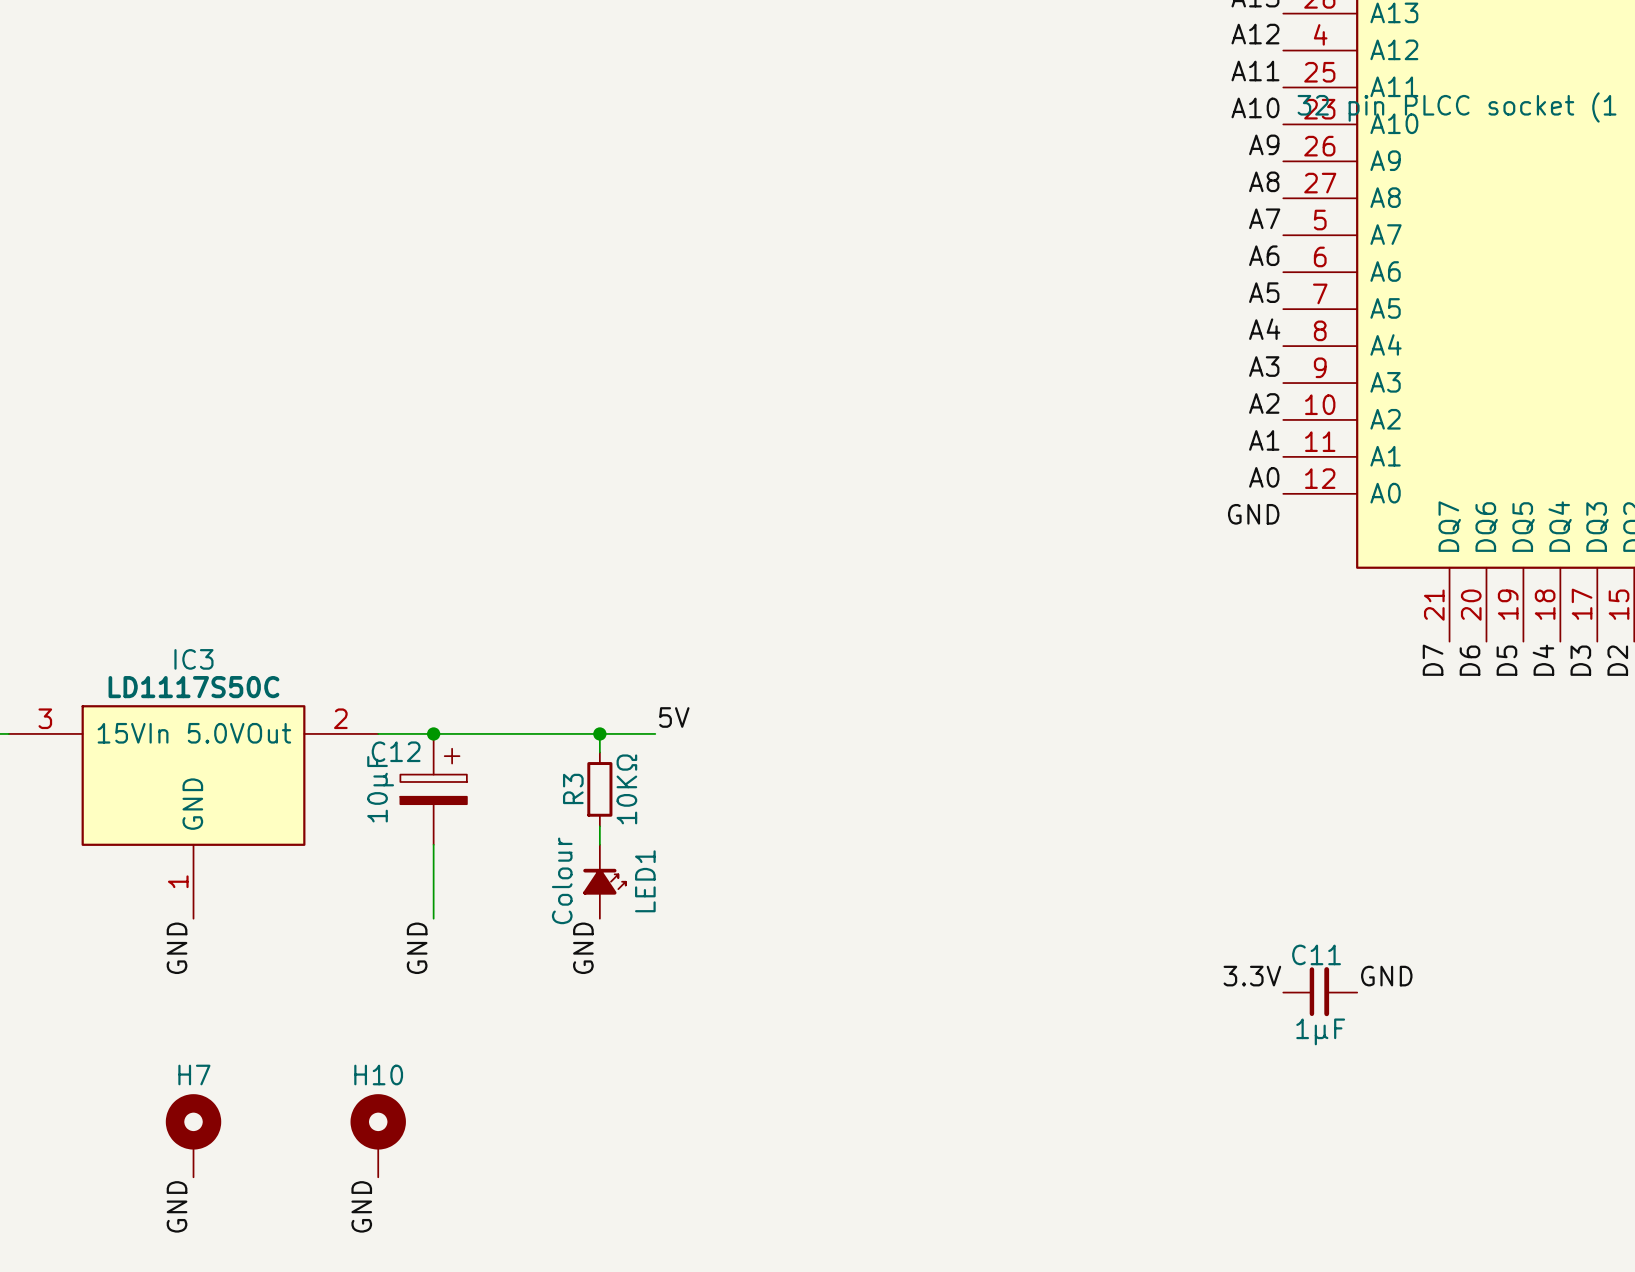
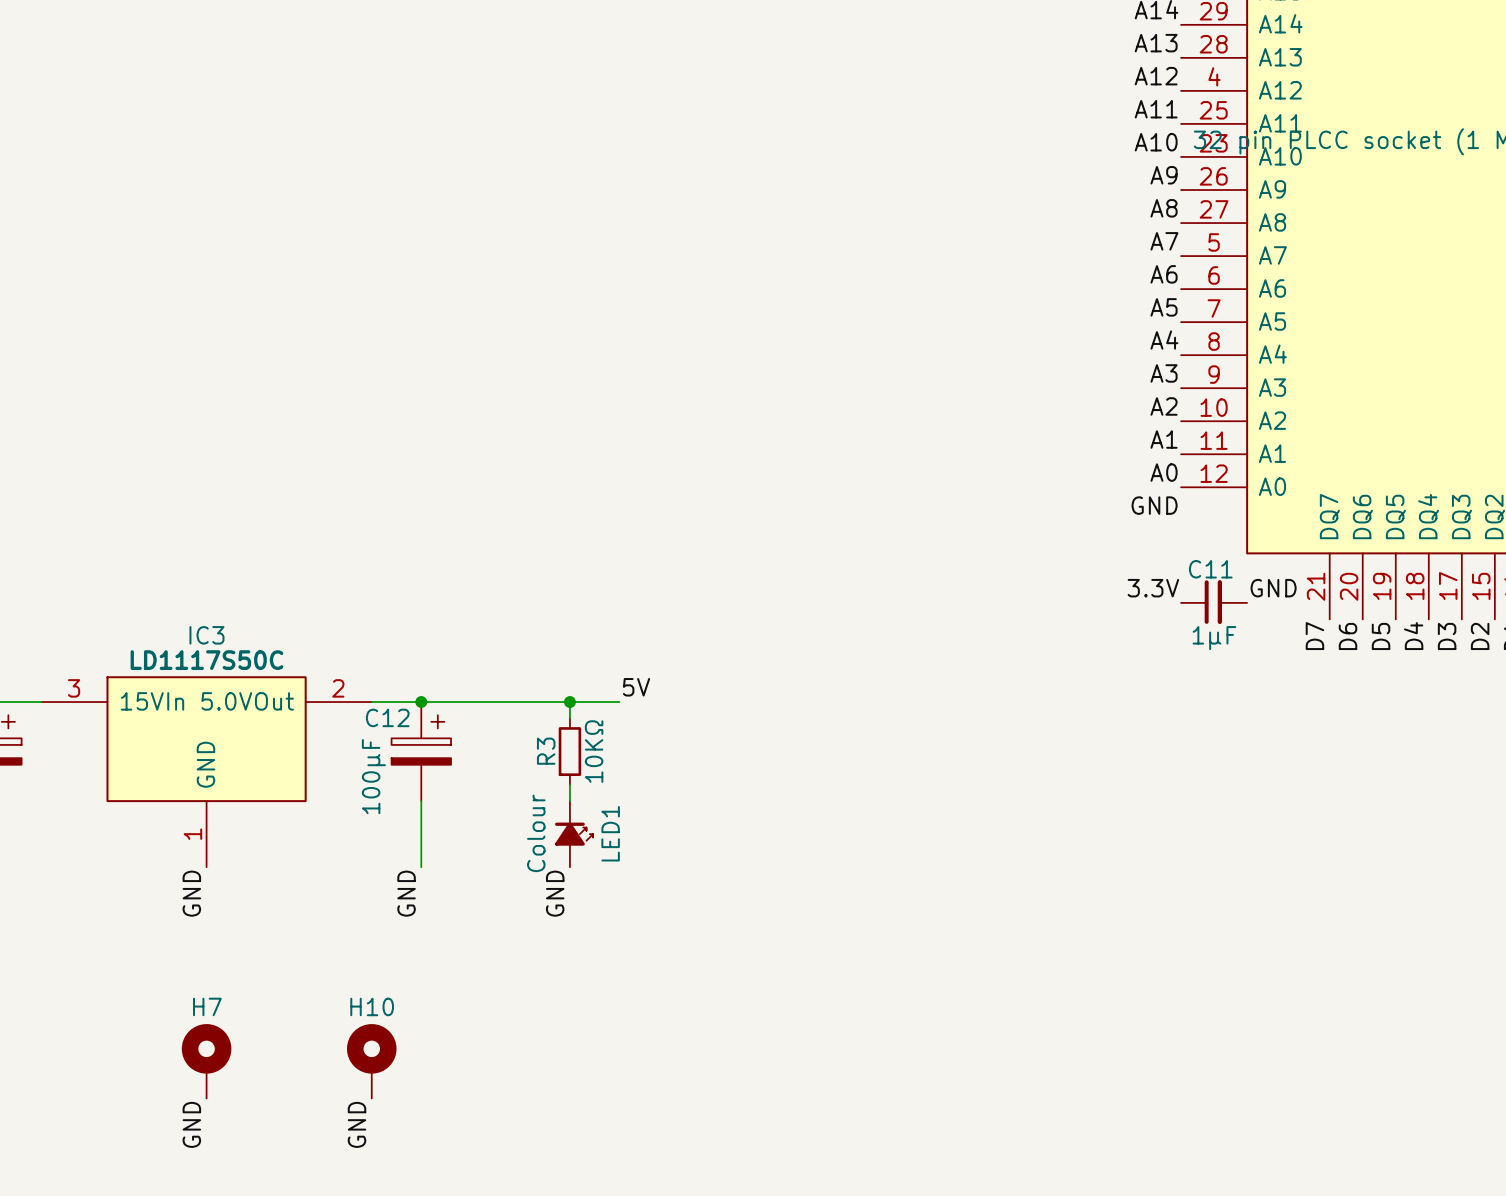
label: none -> 3.3V (1153, 588)
label: none -> GND (1273, 588)
C12 value: 10μF (380, 789) -> 100μF (373, 776)
label: 3.3V (1252, 976) -> none
label: GND (1386, 976) -> none
C11 position: (1320, 991) -> (1214, 602)

